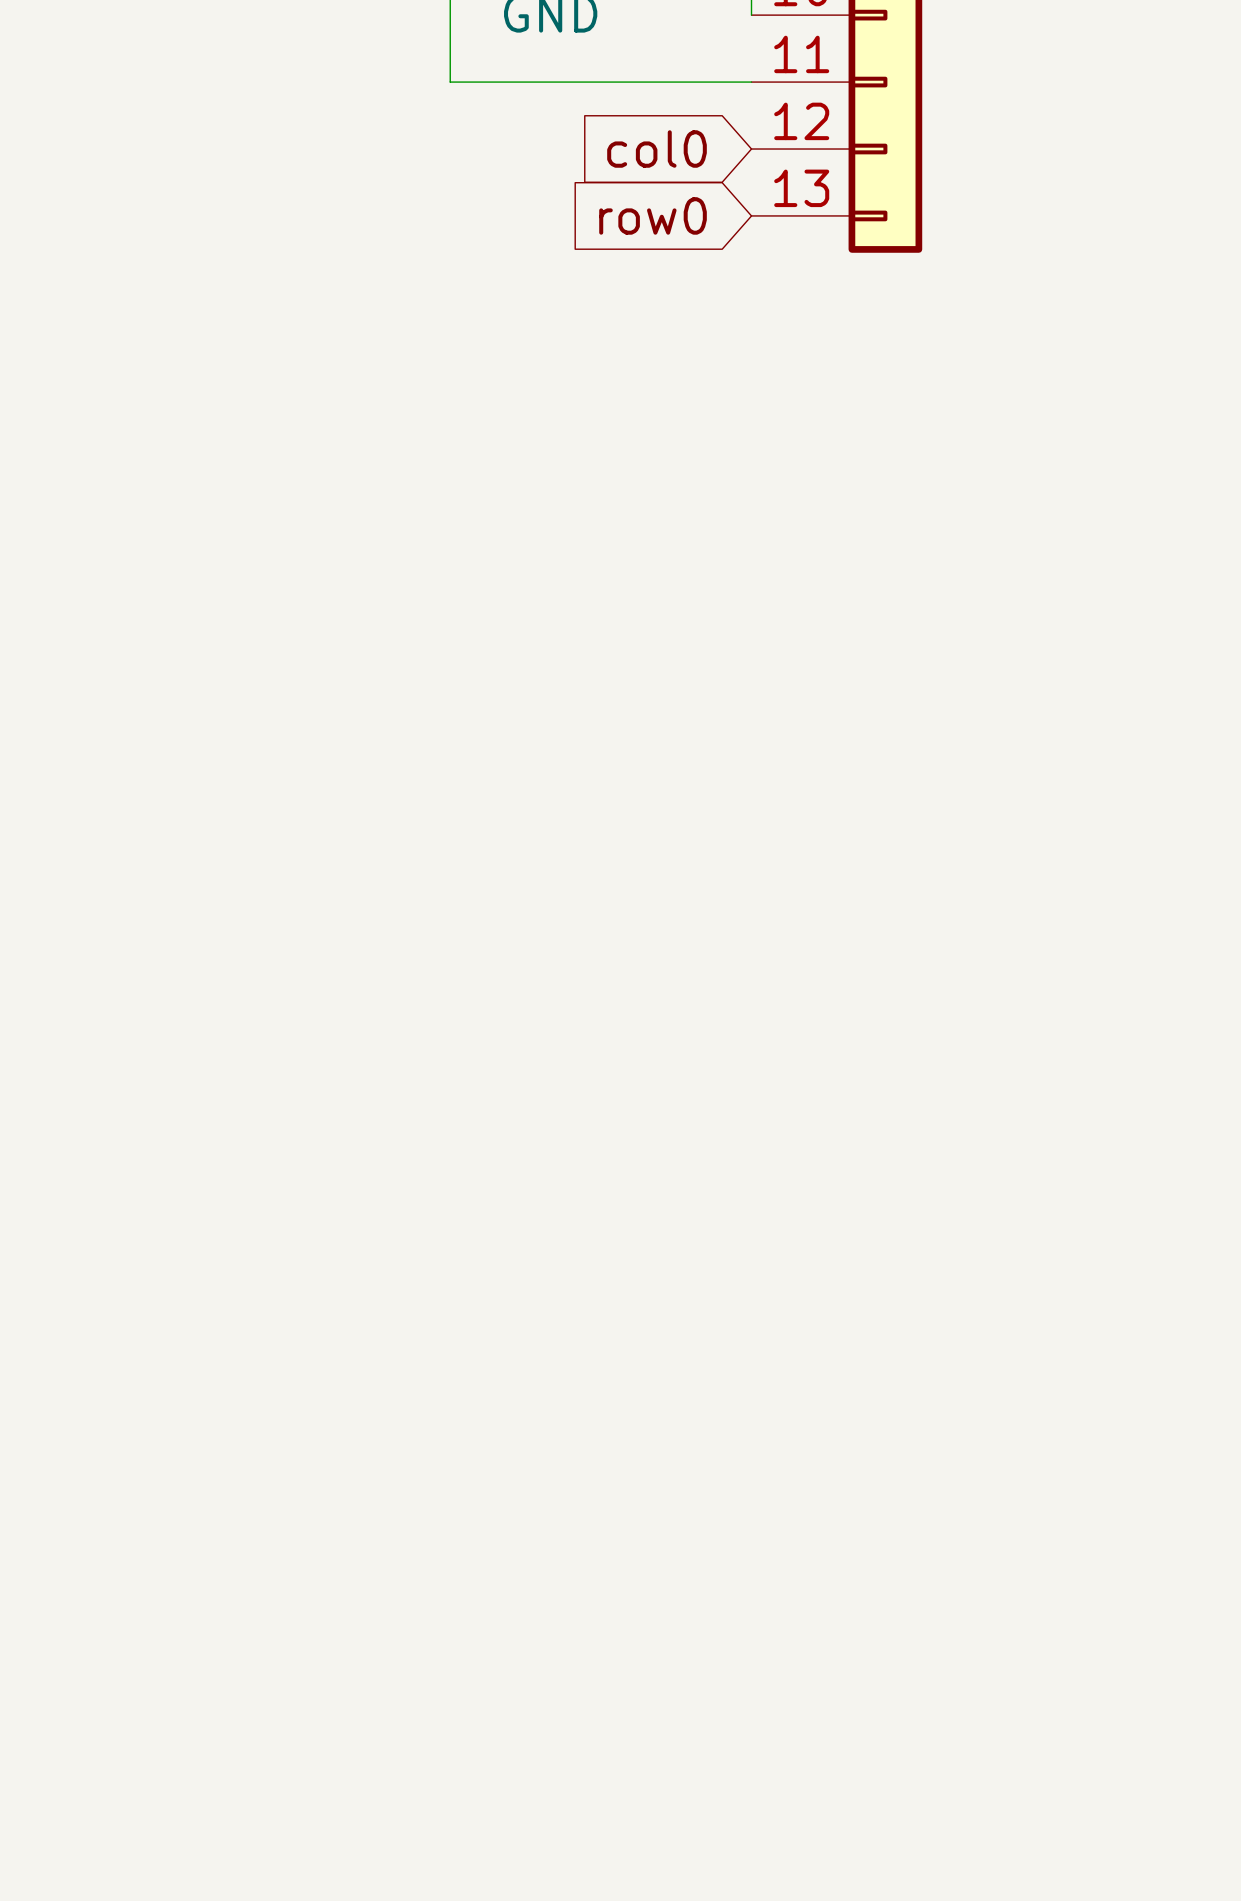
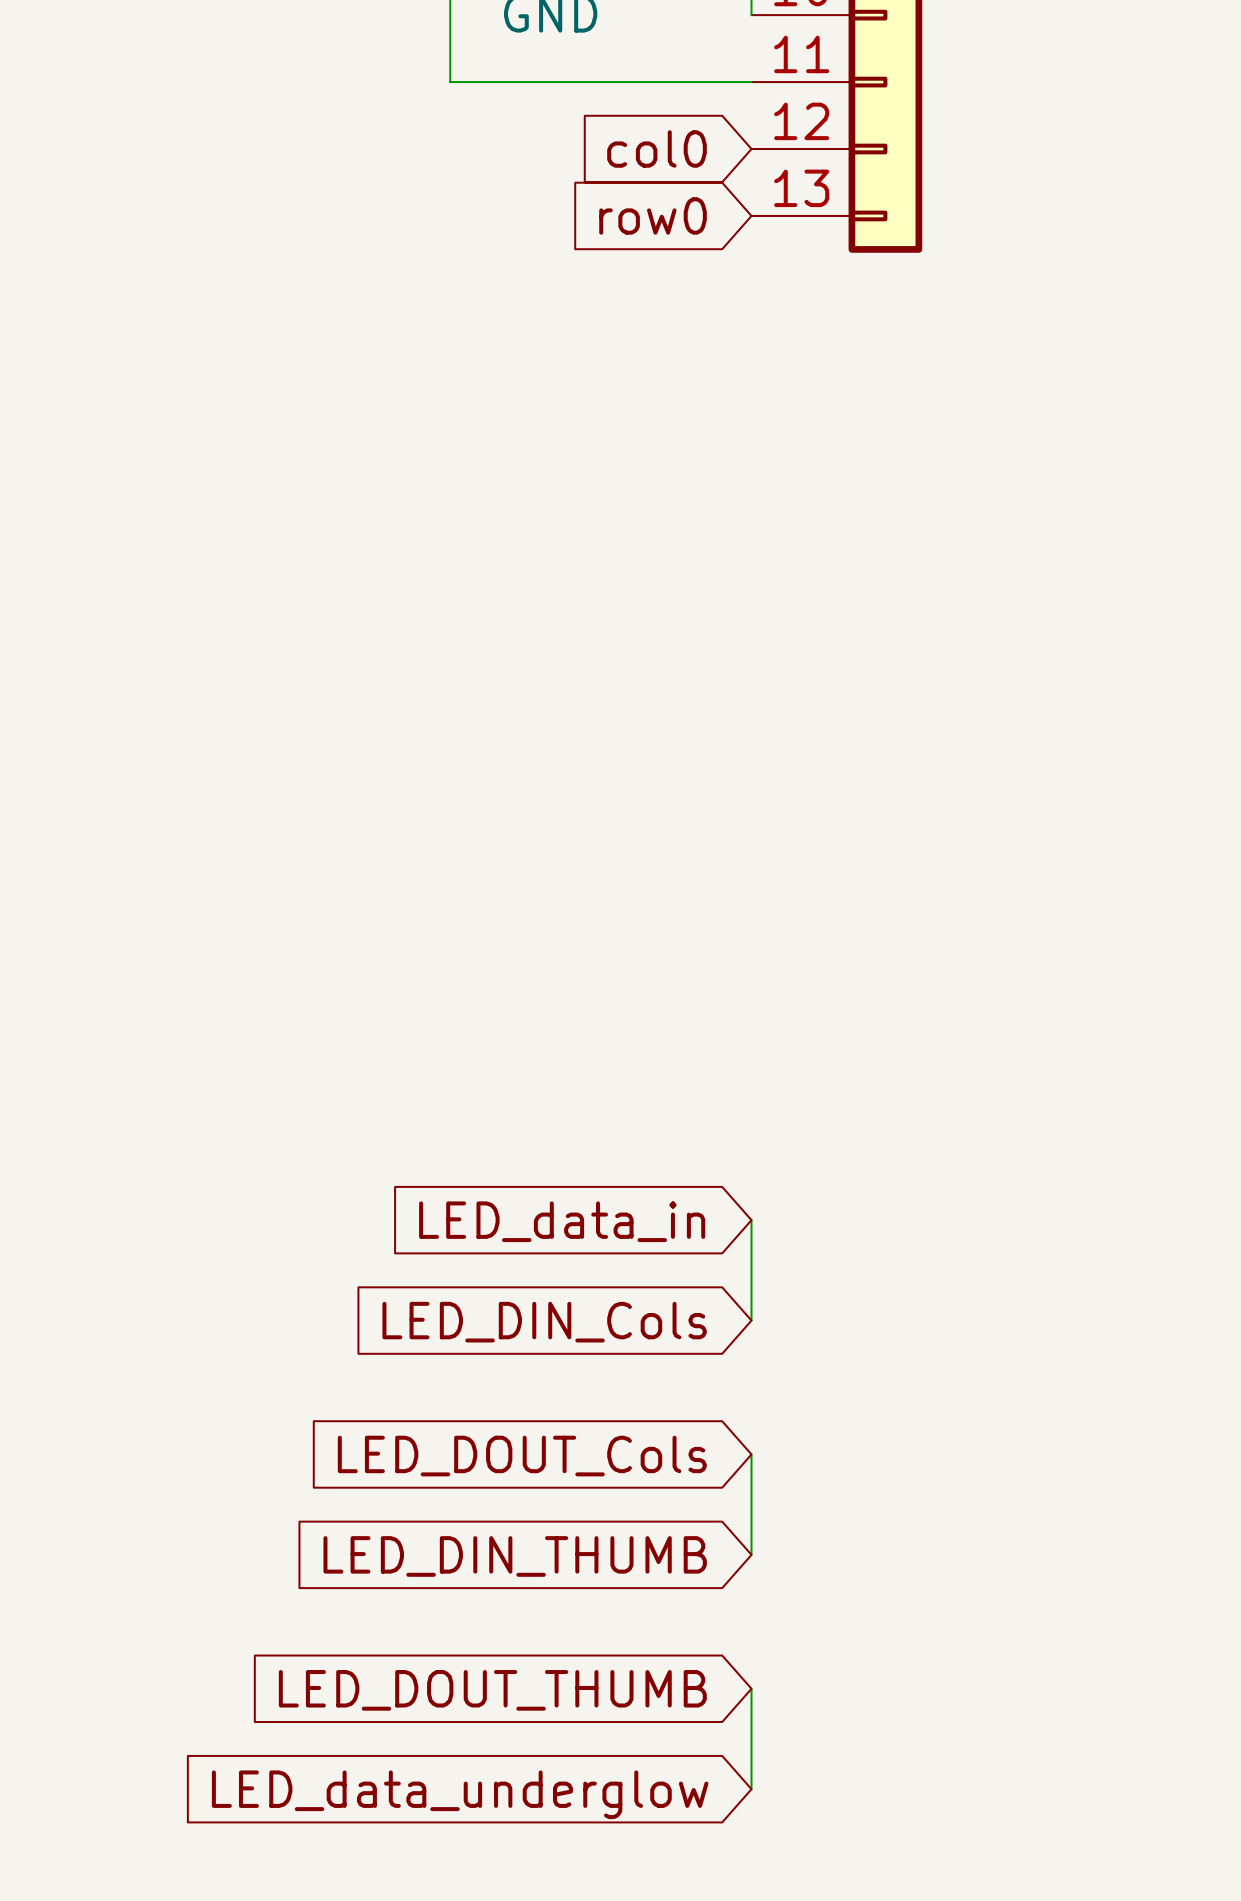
wire: none -> (751, 1220) (751, 1320)
global label: none -> LED_data_in (562, 1221)
global label: none -> LED_DIN_Cols (544, 1322)
wire: none -> (751, 1454) (751, 1554)
global label: none -> LED_DOUT_Cols (522, 1456)
global label: none -> LED_DIN_THUMB (515, 1556)
wire: none -> (751, 1688) (751, 1789)
global label: none -> LED_DOUT_THUMB (492, 1690)
global label: none -> LED_data_underglow (460, 1794)

